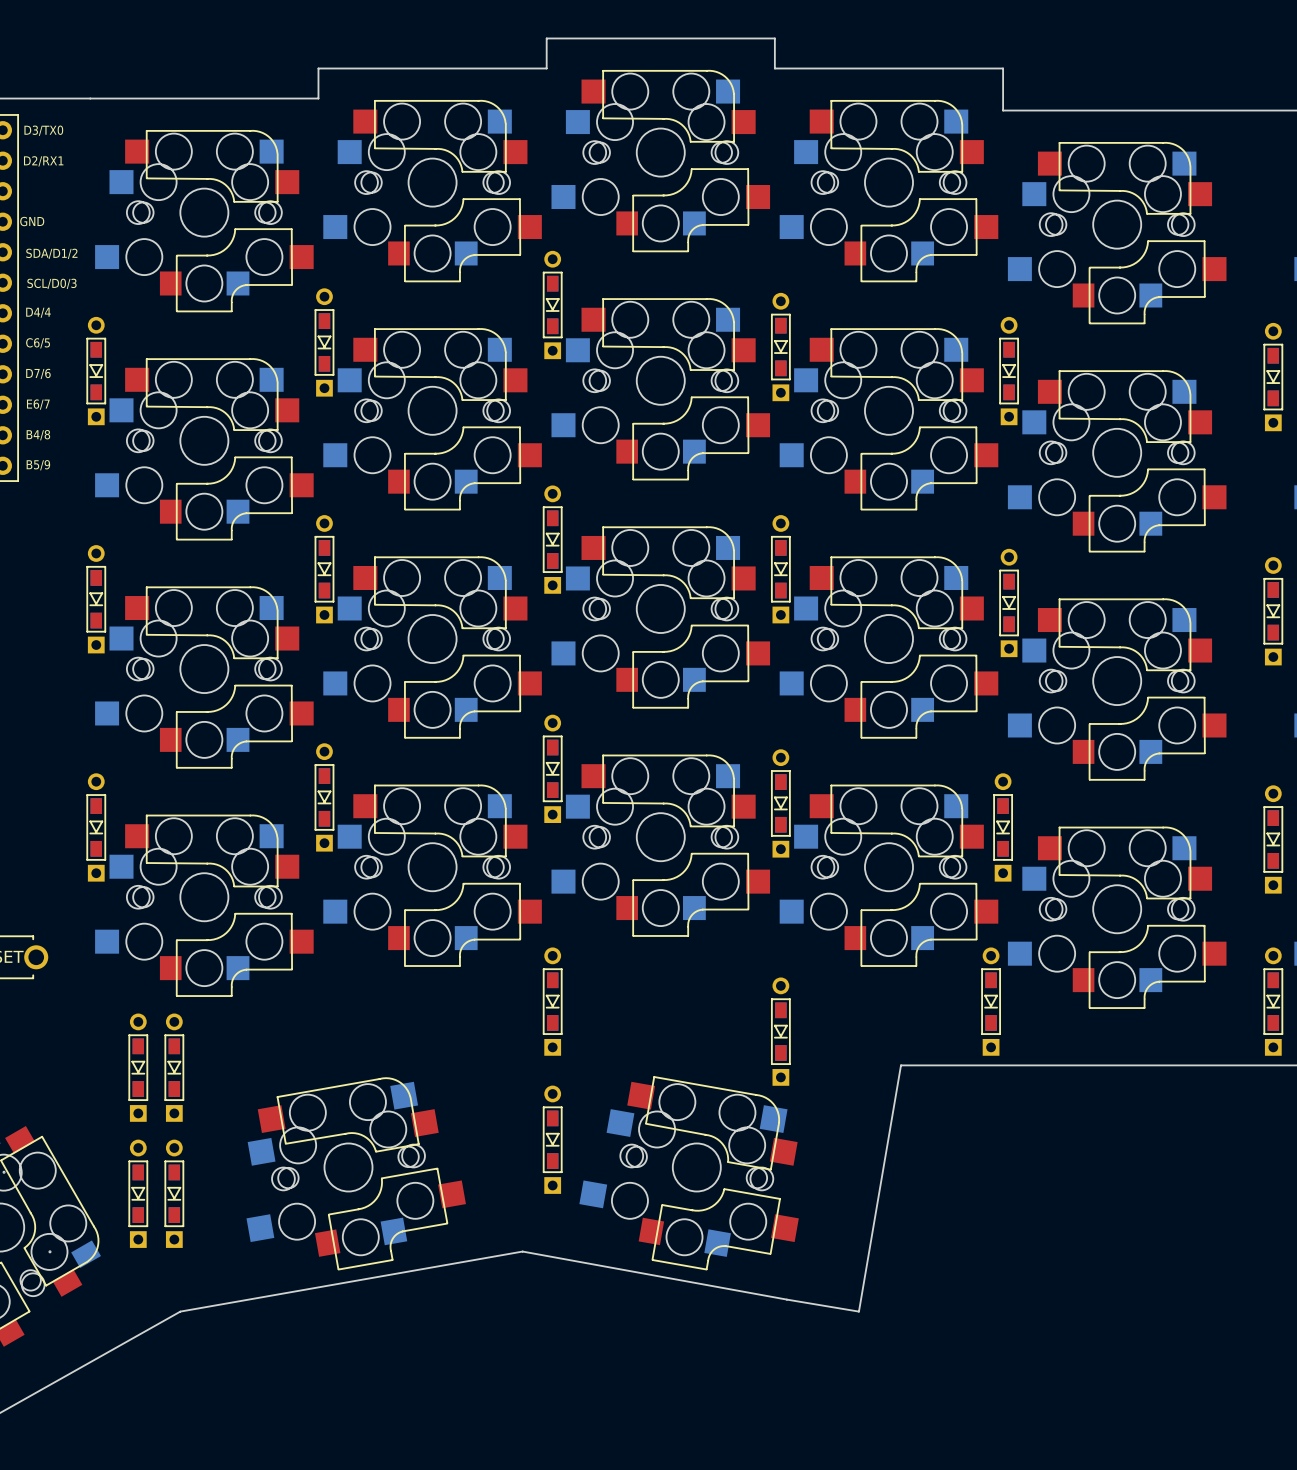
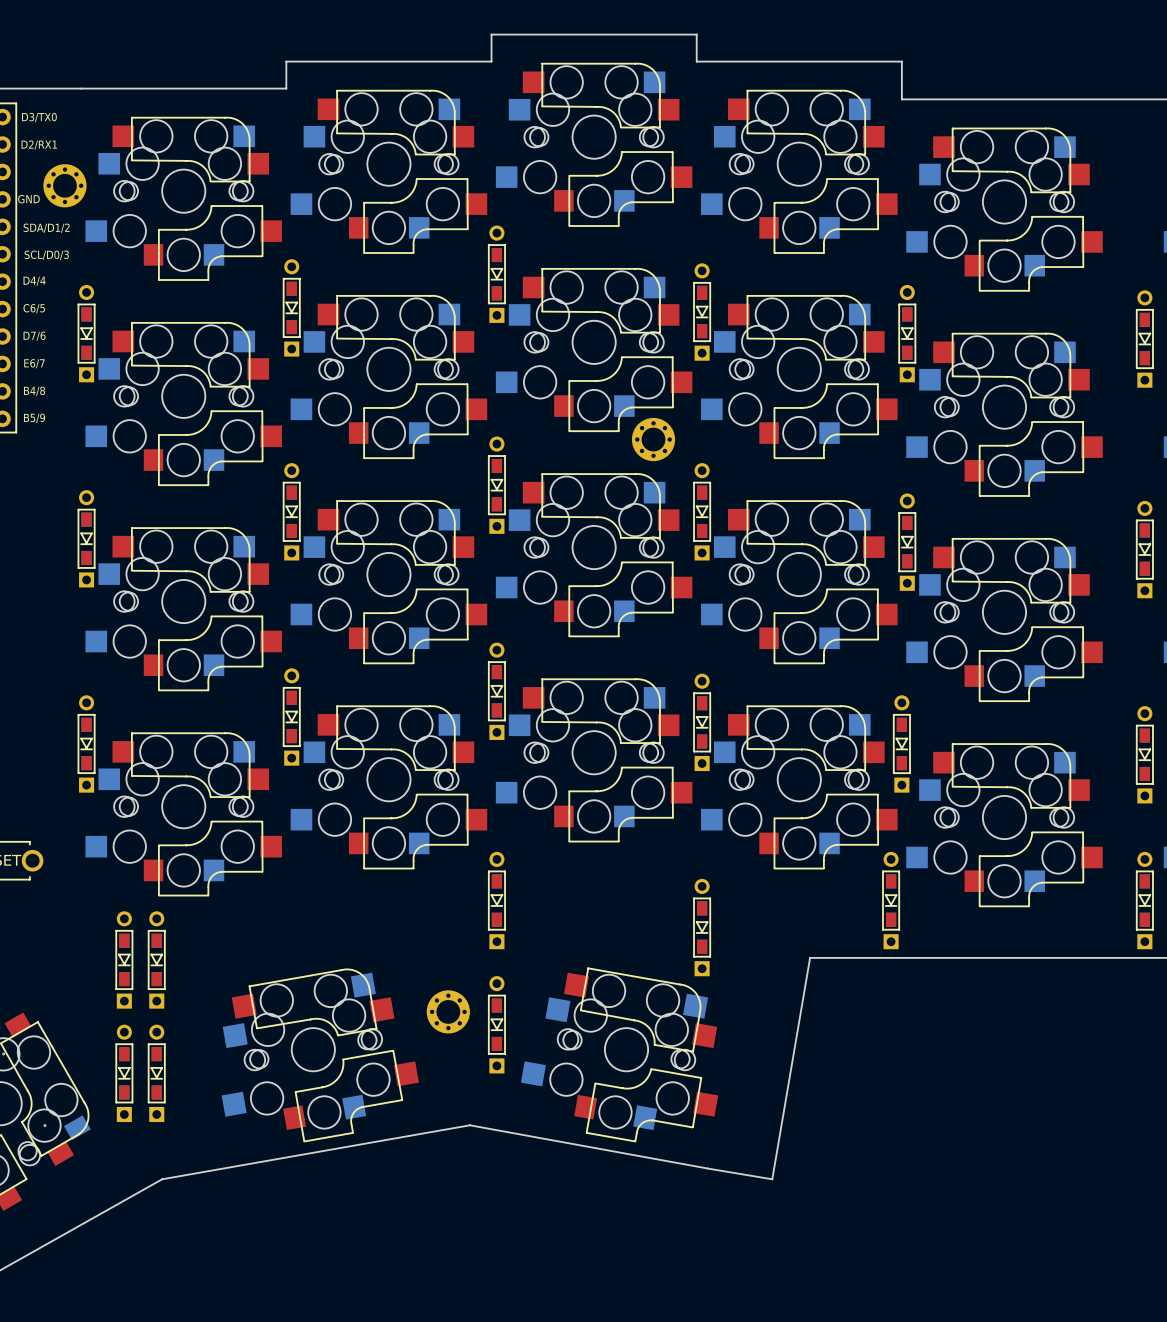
part: none -> (64, 185)
part: none -> (653, 439)
part: none -> (448, 1011)

